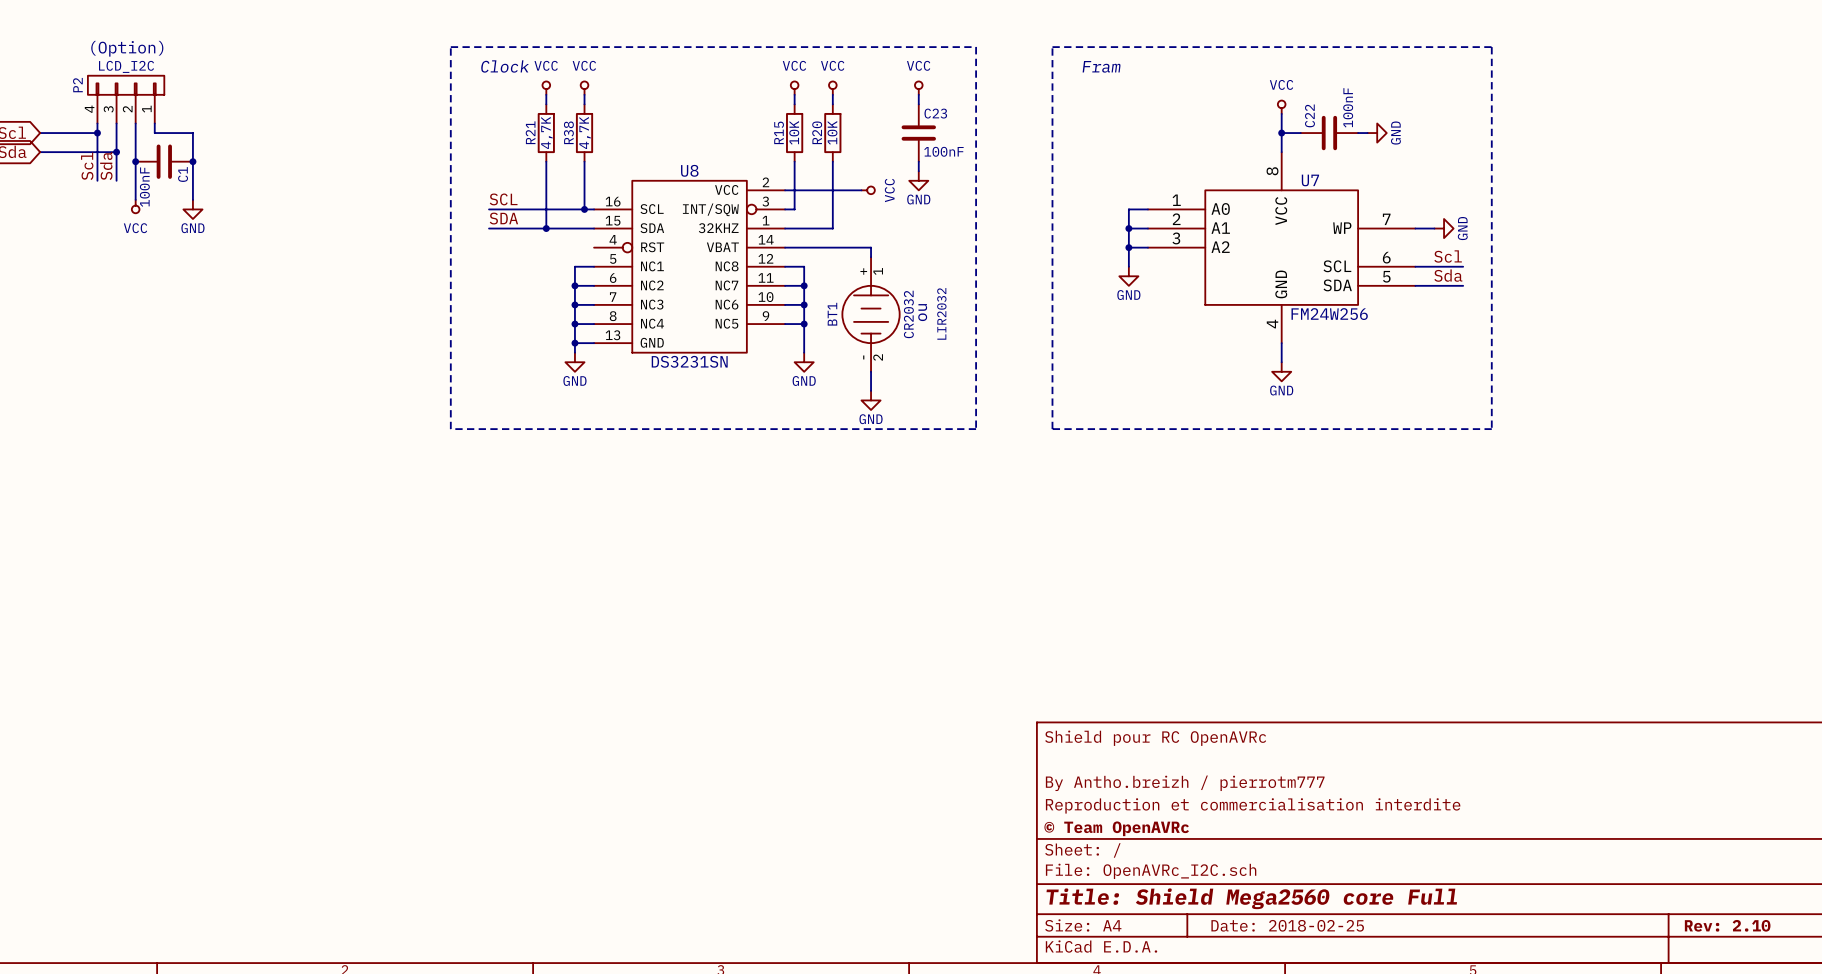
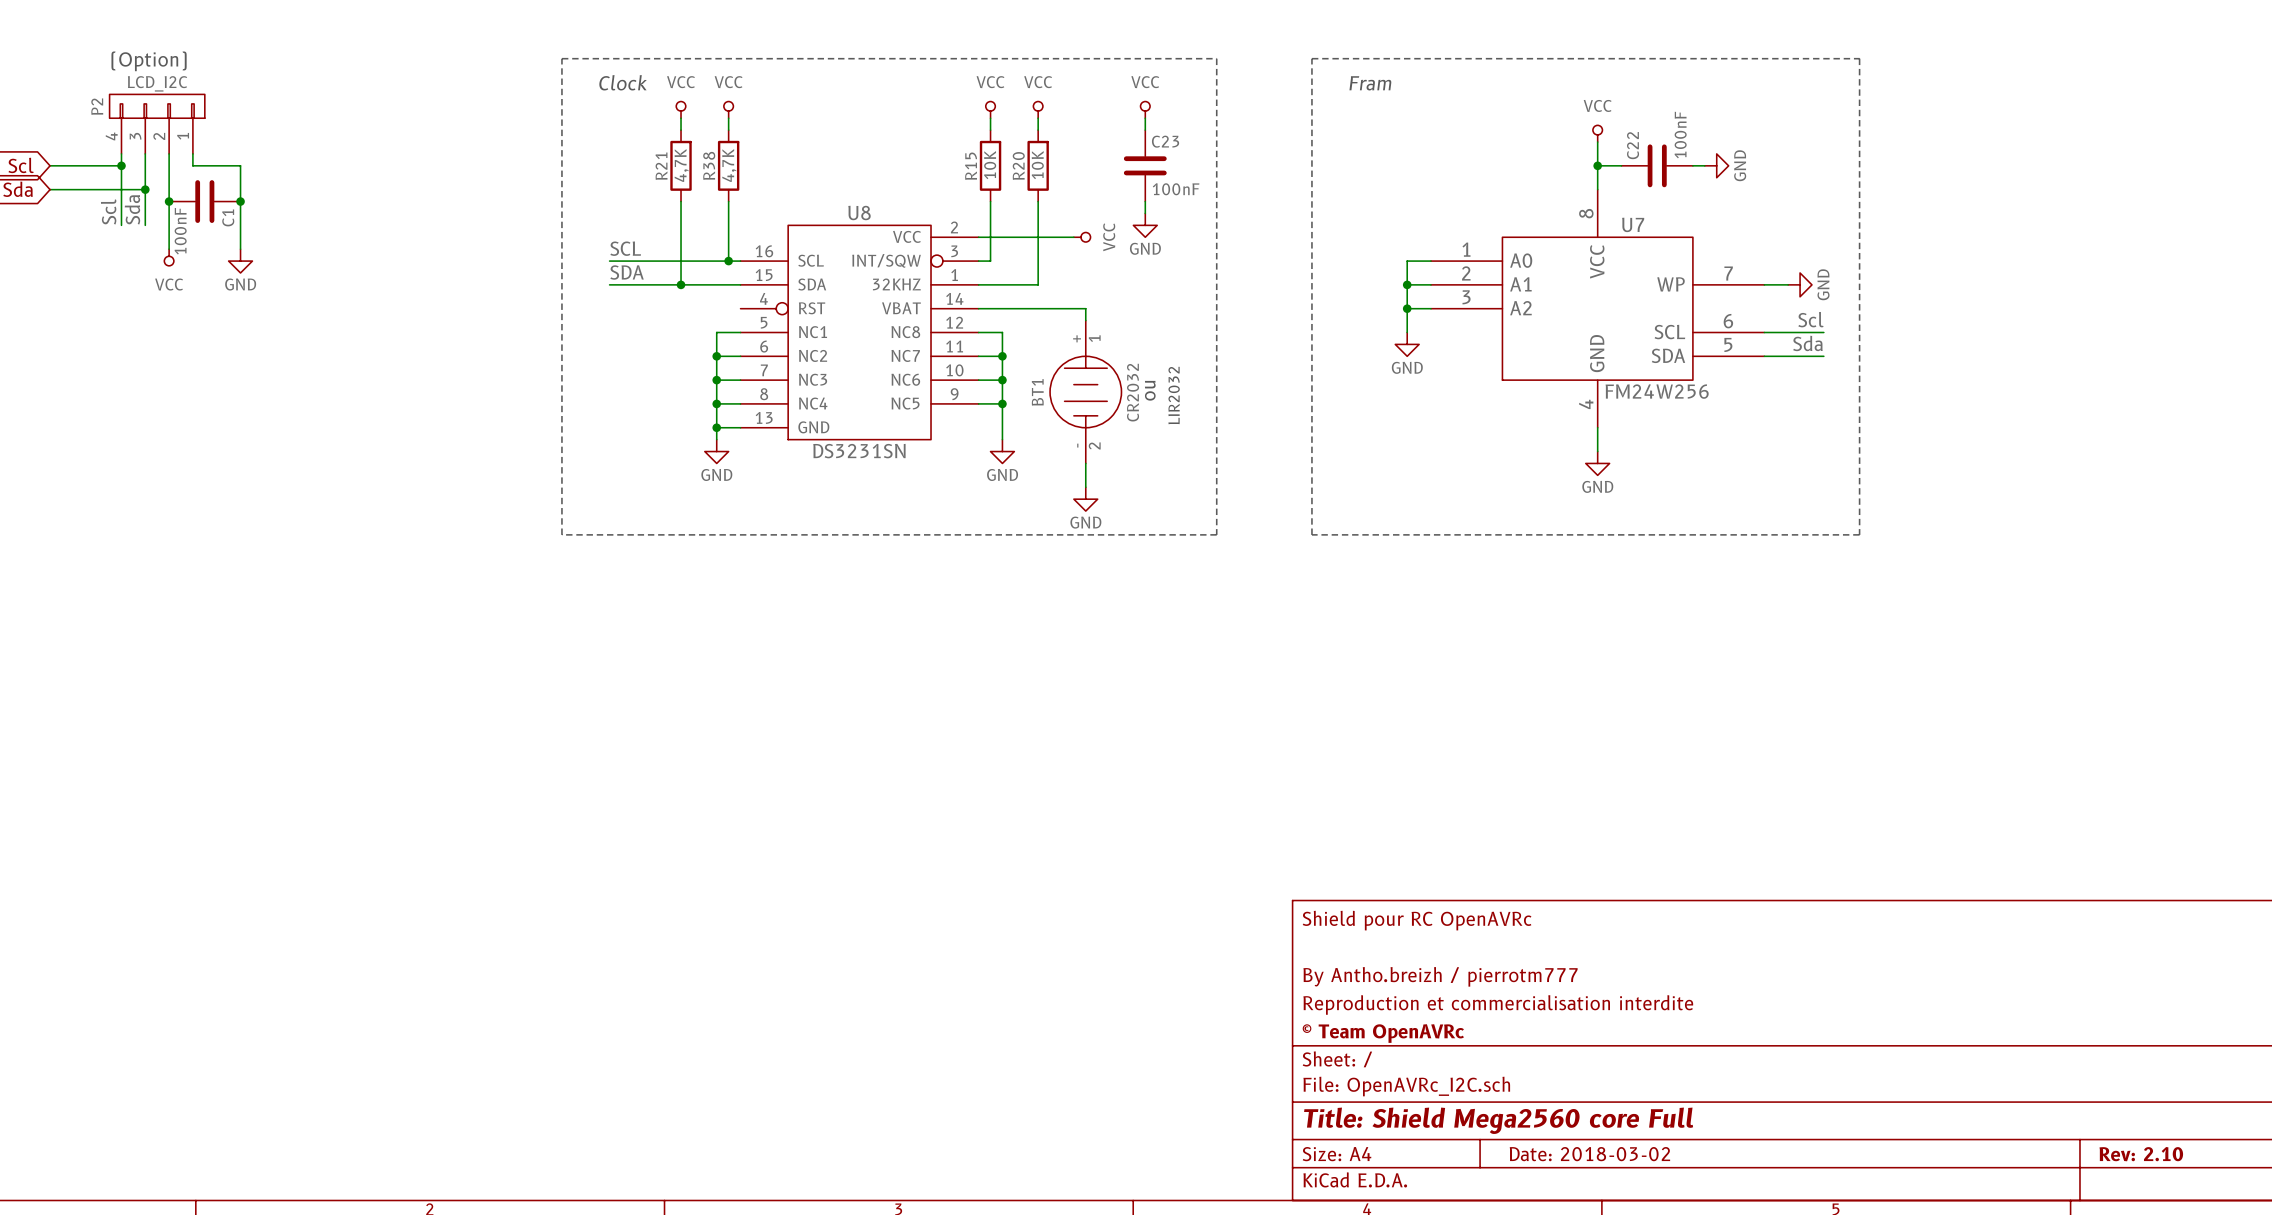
title block: Date: 2018-02-25 (1287, 925) -> Date: 2018-03-02 (1589, 1154)

